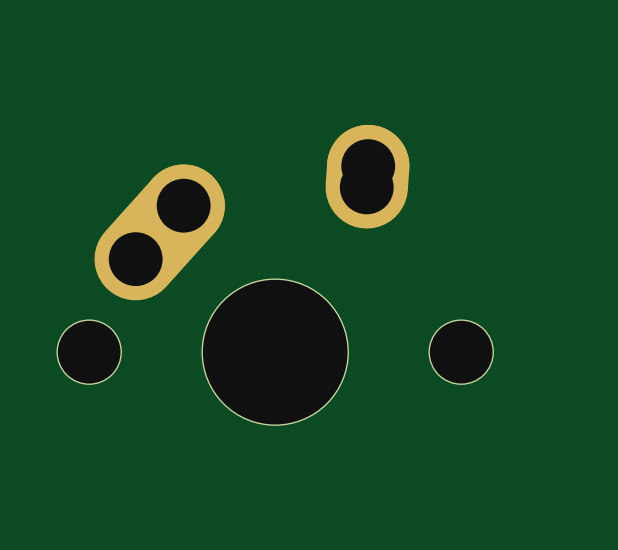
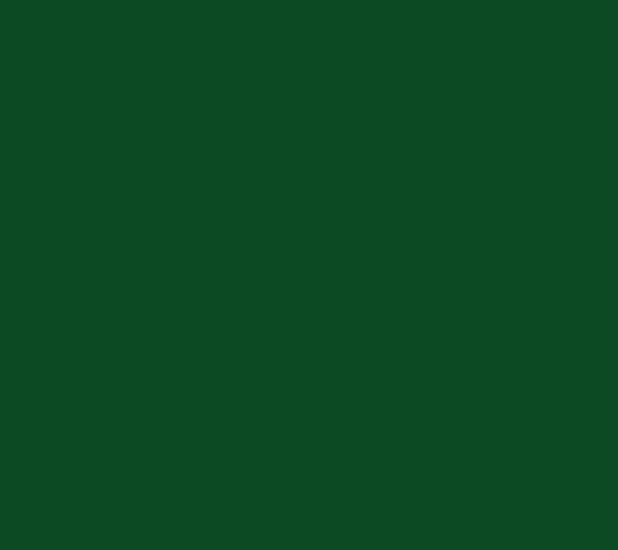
part: (275, 275) -> none

